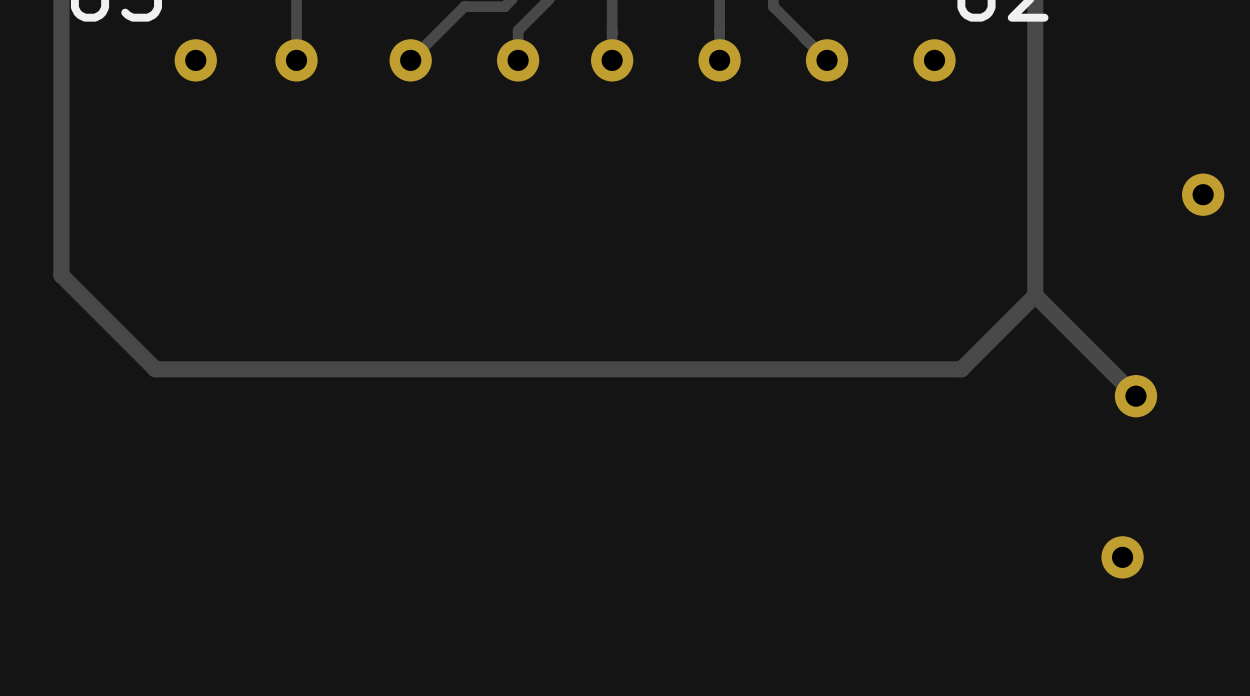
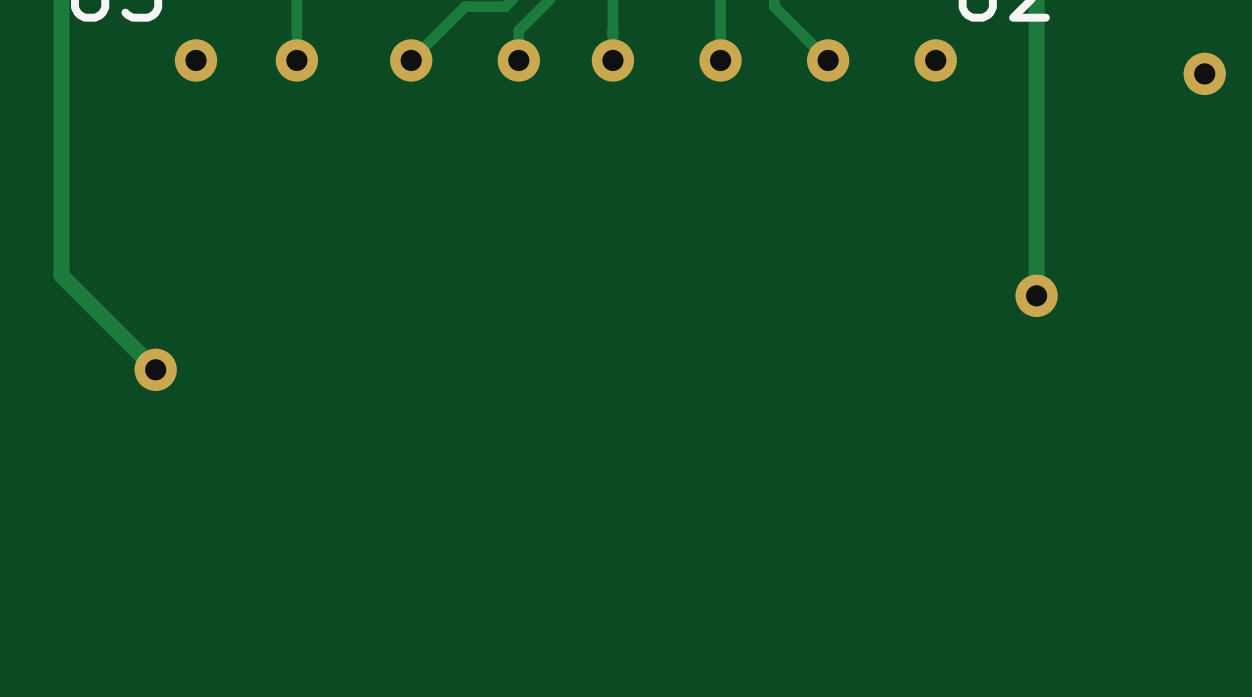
via: none -> (1204, 73)
via: (1203, 194) -> none
via: none -> (1036, 295)
track: (155, 369) (961, 369) (1035, 295) (1135, 396) -> none
via: none -> (155, 369)
via: (1135, 396) -> none
via: (1122, 557) -> none

